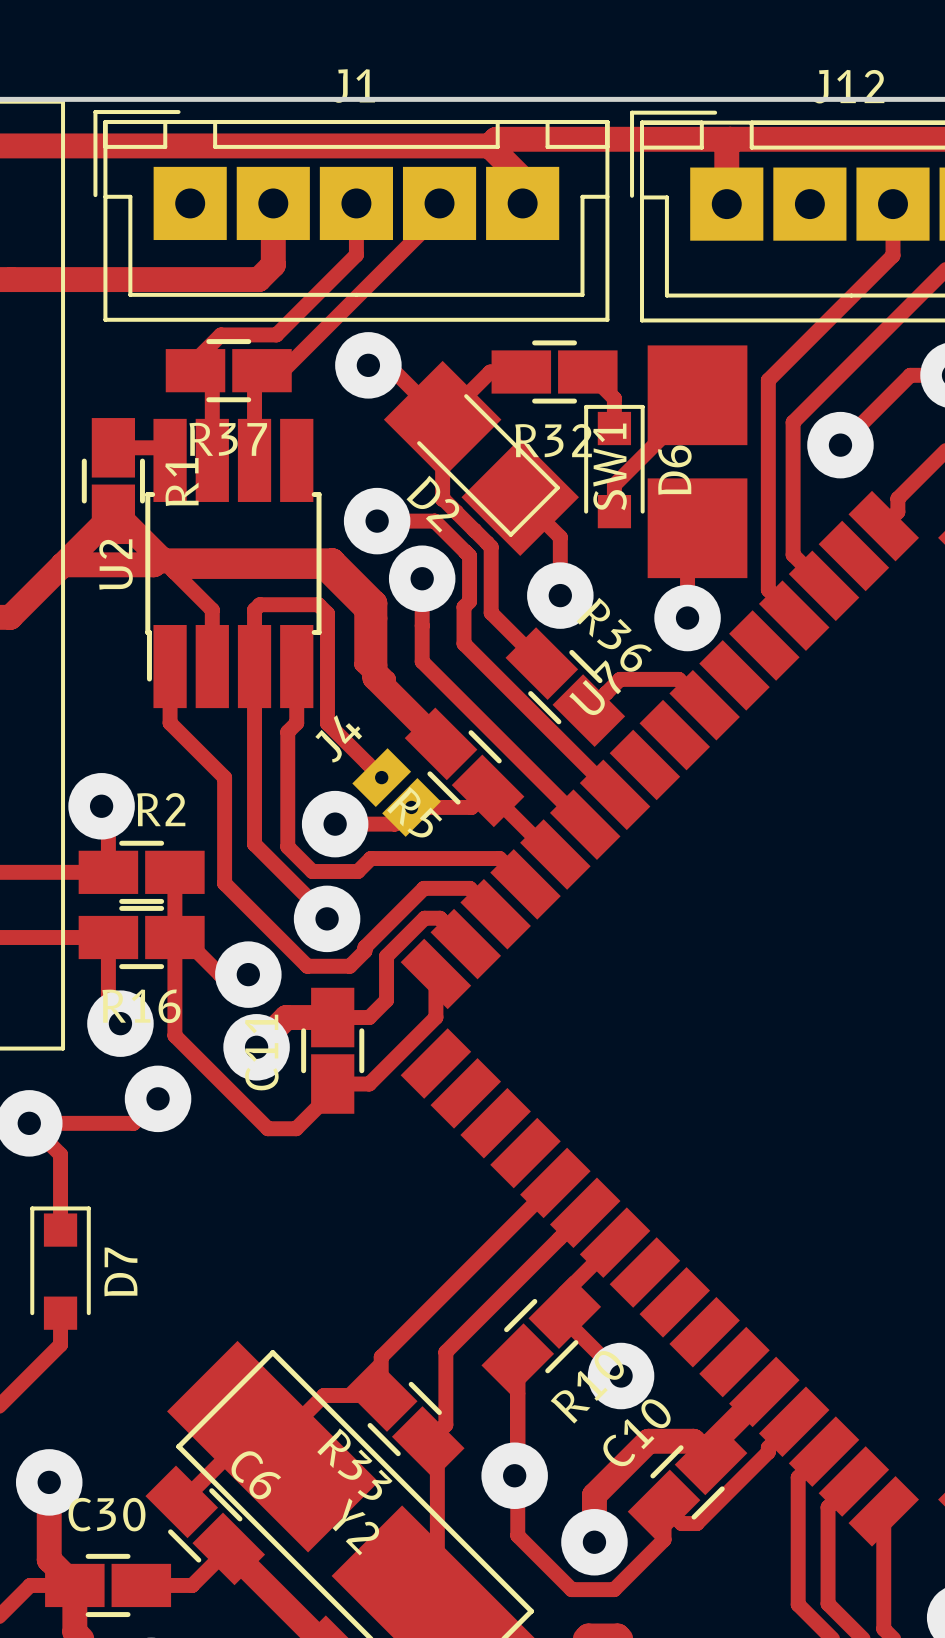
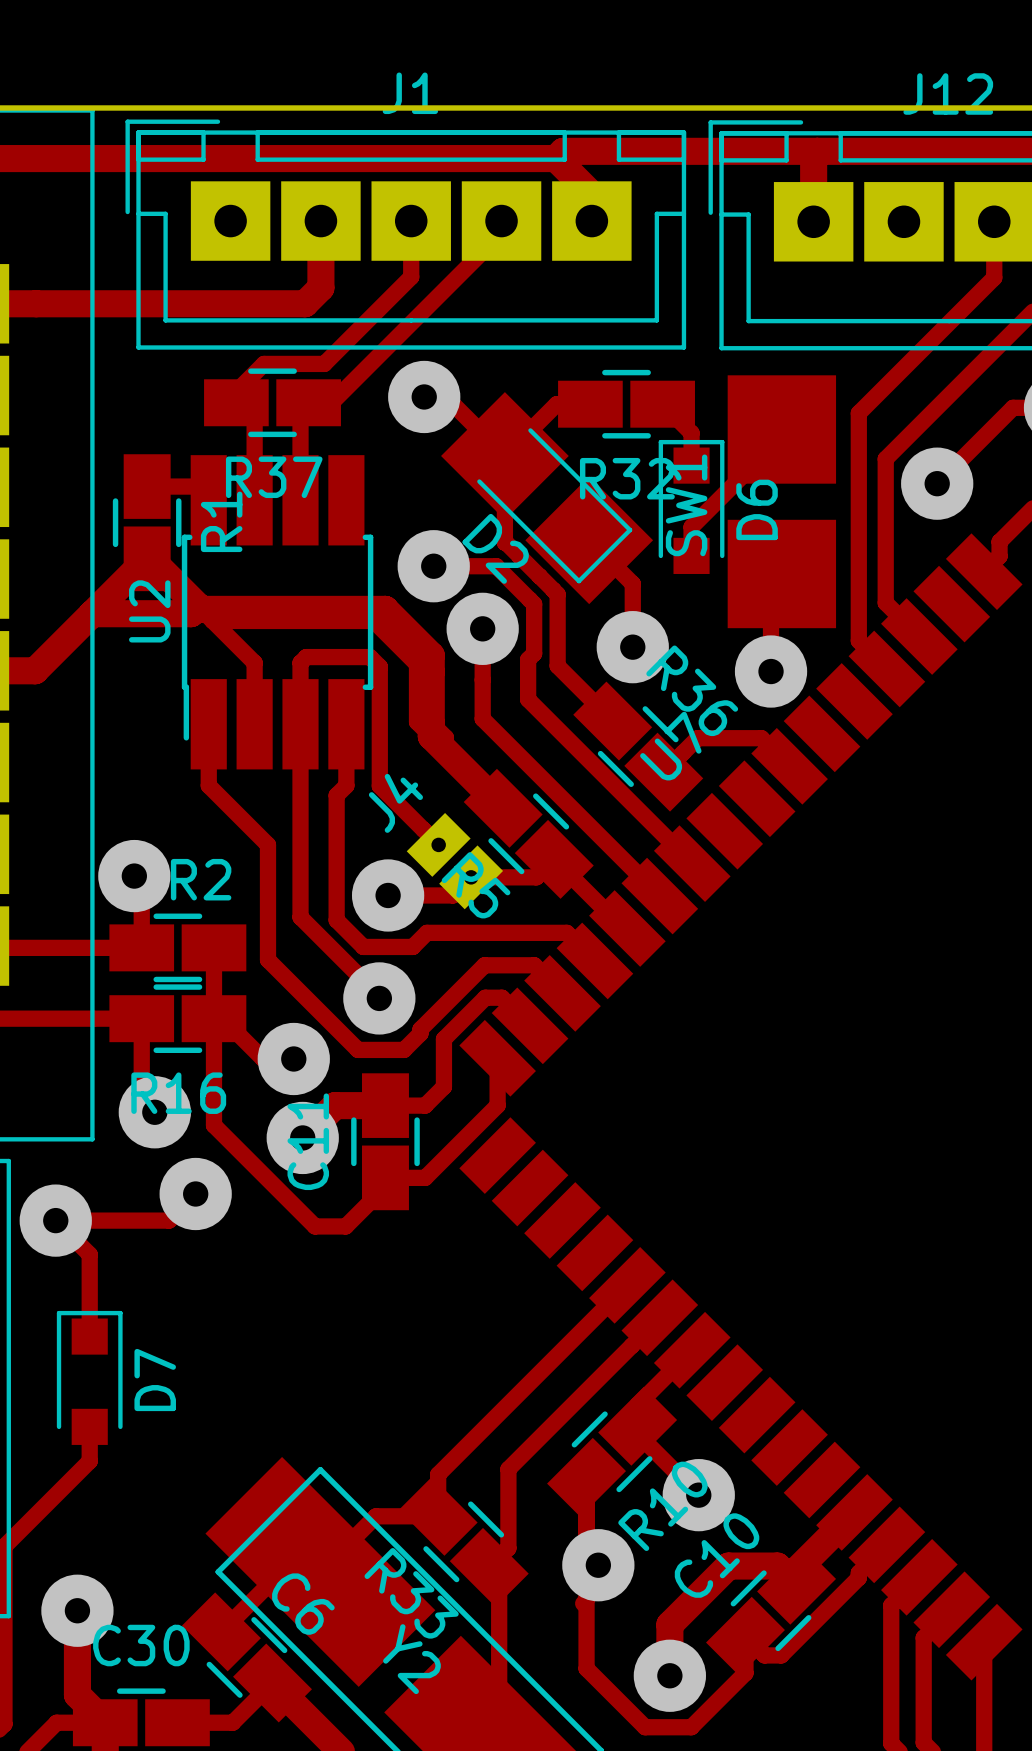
via position: (514, 1475) -> (598, 1565)

